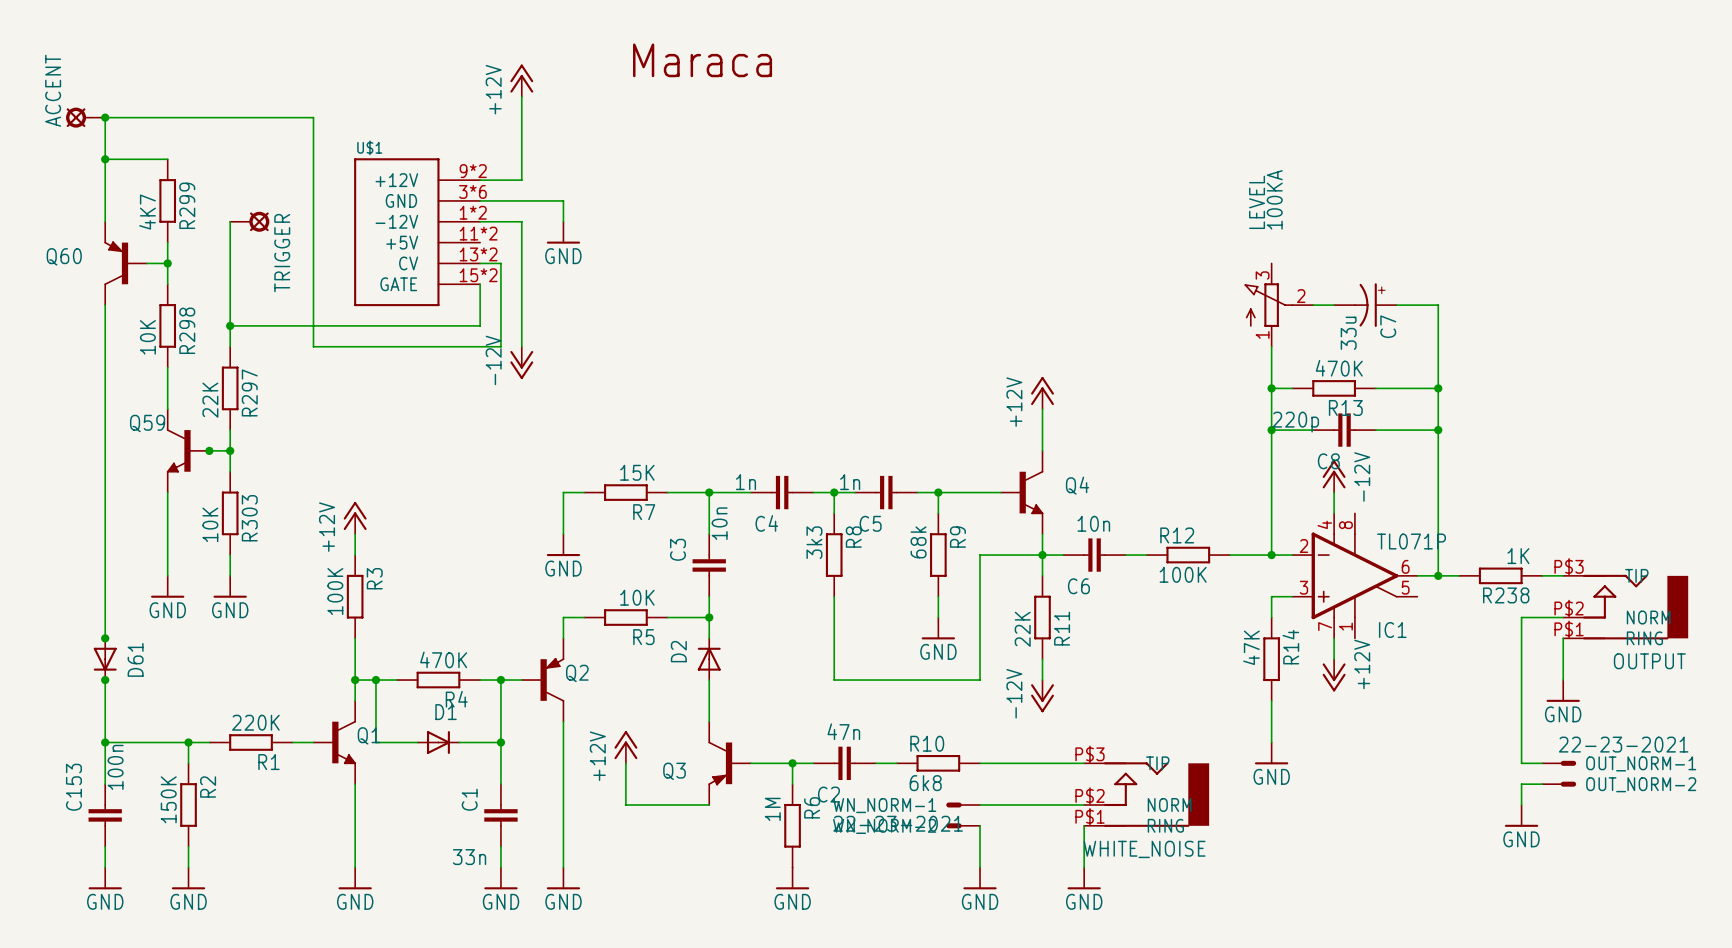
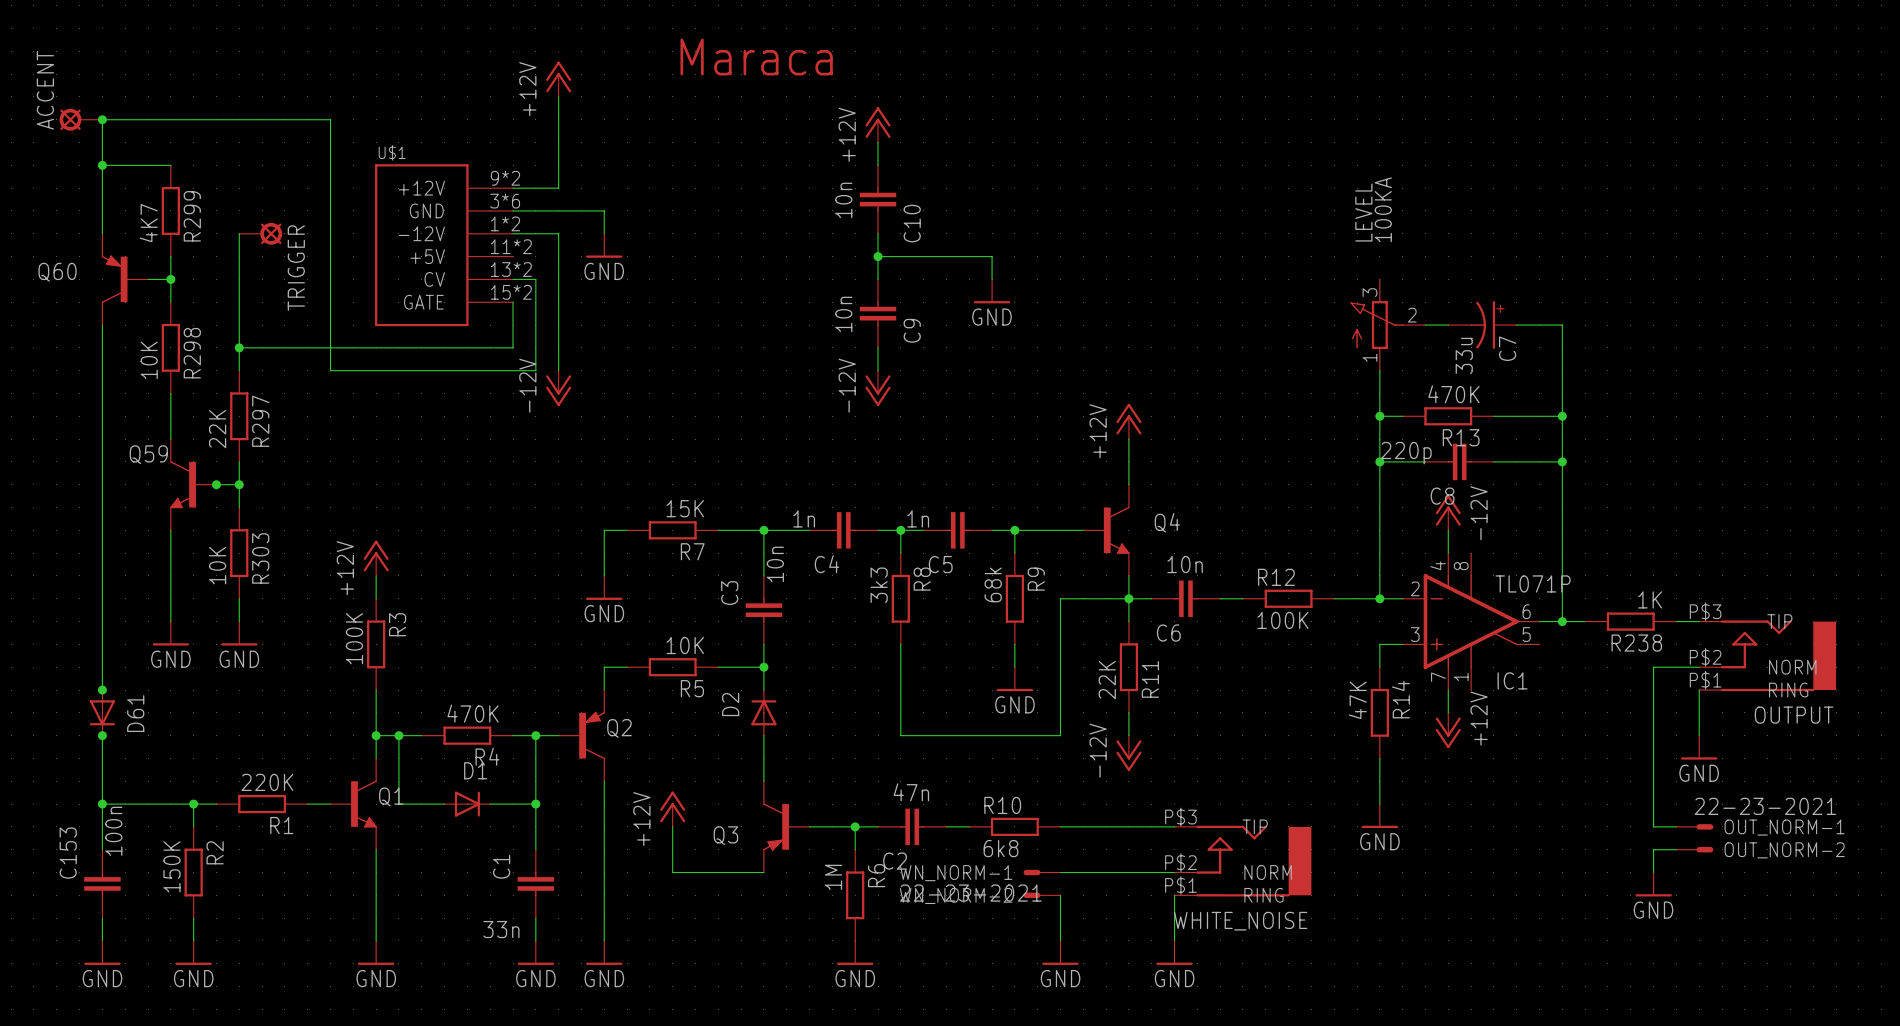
power symbol: none -> +12V (878, 124)
wire: none -> (878, 142) (878, 165)
C10: none -> 10n (878, 199)
wire: none -> (878, 233) (878, 279)
wire: none -> (878, 256) (992, 256) (992, 279)
junction: none -> (878, 256)
power symbol: none -> GND (992, 291)
C9: none -> 10n (878, 313)
wire: none -> (878, 347) (878, 370)
power symbol: none -> -12V (878, 388)

